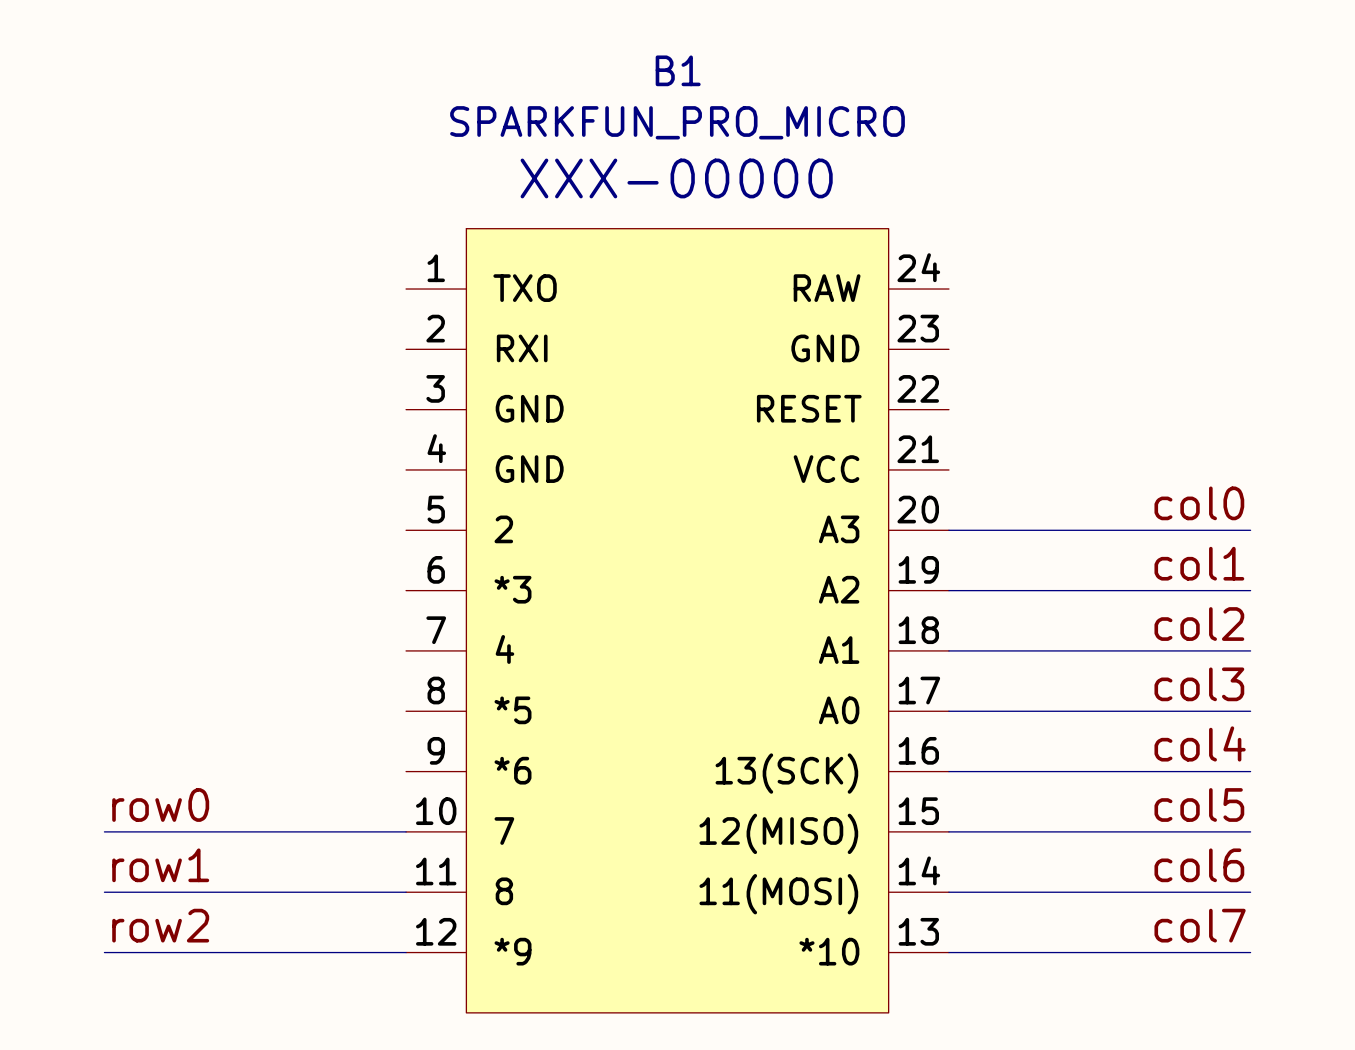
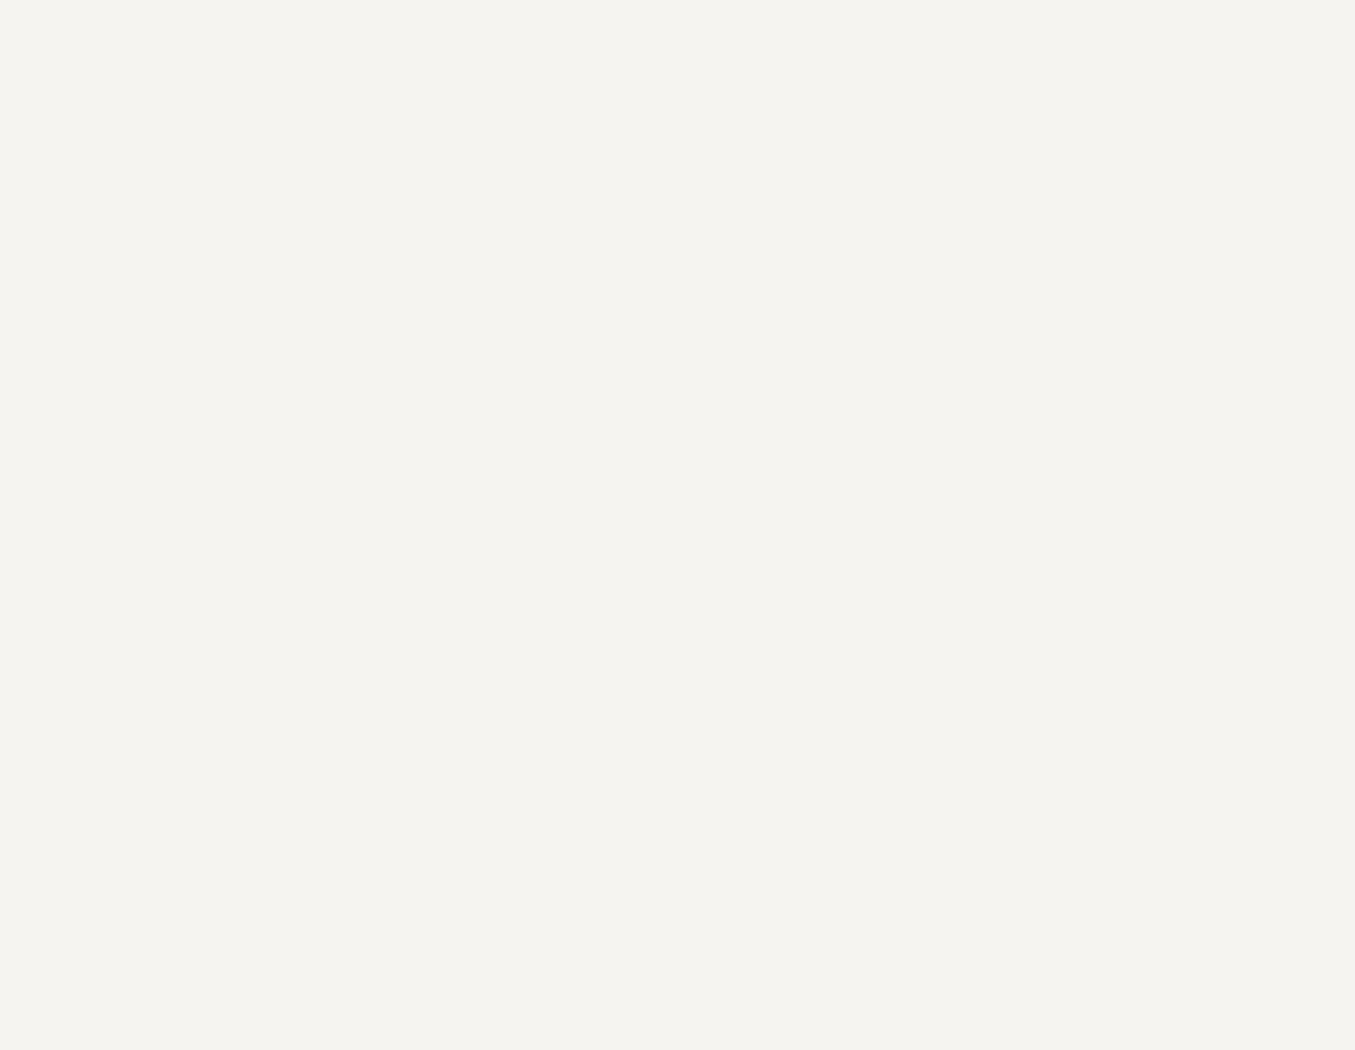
label: col0 (1199, 503) -> none
wire: (948, 530) (1250, 530) -> none
label: col1 (1199, 563) -> none
wire: (948, 590) (1250, 590) -> none
B1: SPARKFUN_PRO_MICRO (677, 620) -> none
label: col2 (1199, 624) -> none
wire: (948, 650) (1250, 650) -> none
label: col3 (1199, 684) -> none
wire: (948, 711) (1250, 711) -> none
label: col4 (1200, 743) -> none
wire: (948, 771) (1250, 771) -> none
label: row0 (160, 804) -> none
label: col5 (1199, 804) -> none
wire: (104, 831) (406, 831) -> none
wire: (948, 831) (1250, 831) -> none
label: row1 (160, 865) -> none
label: col6 (1199, 865) -> none
wire: (104, 892) (406, 892) -> none
wire: (948, 892) (1250, 892) -> none
label: row2 (160, 925) -> none
label: col7 (1200, 925) -> none
wire: (104, 952) (406, 952) -> none
wire: (948, 952) (1250, 952) -> none

